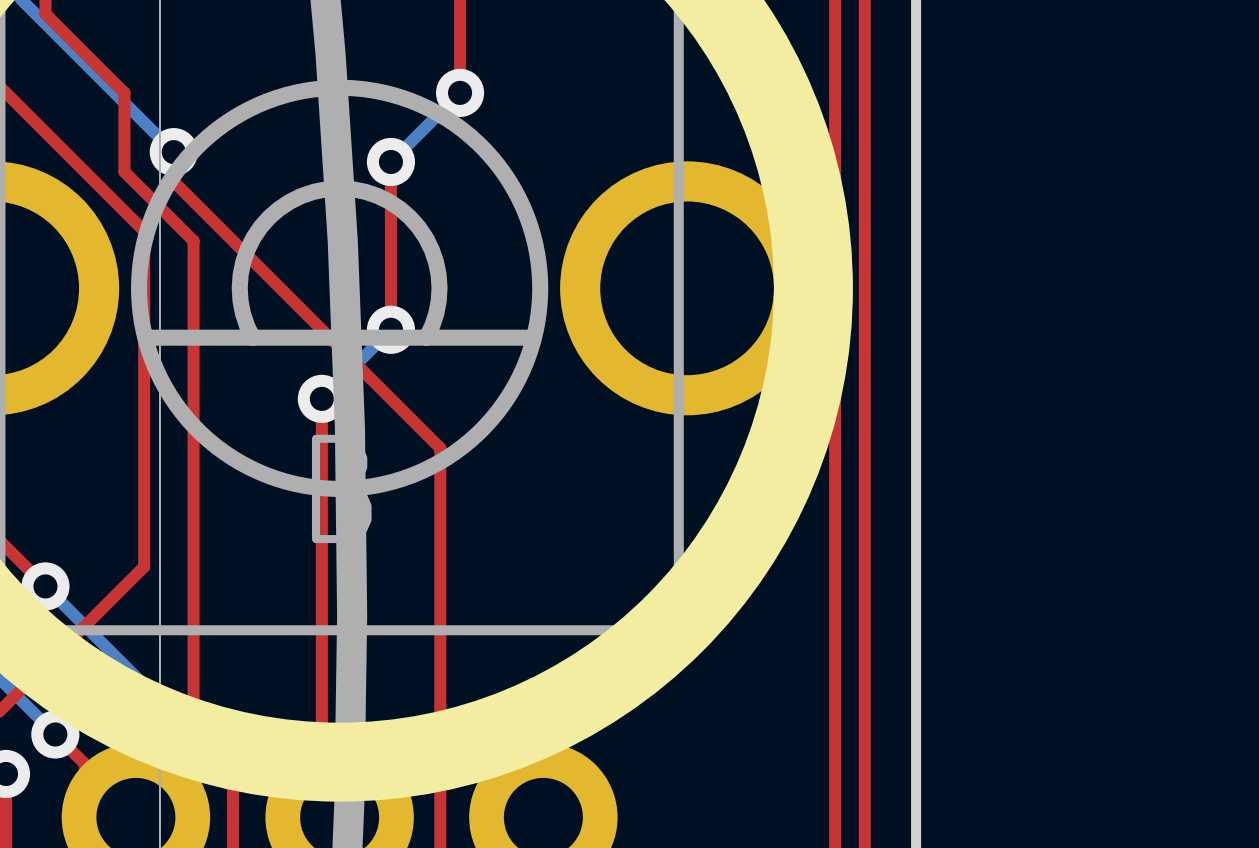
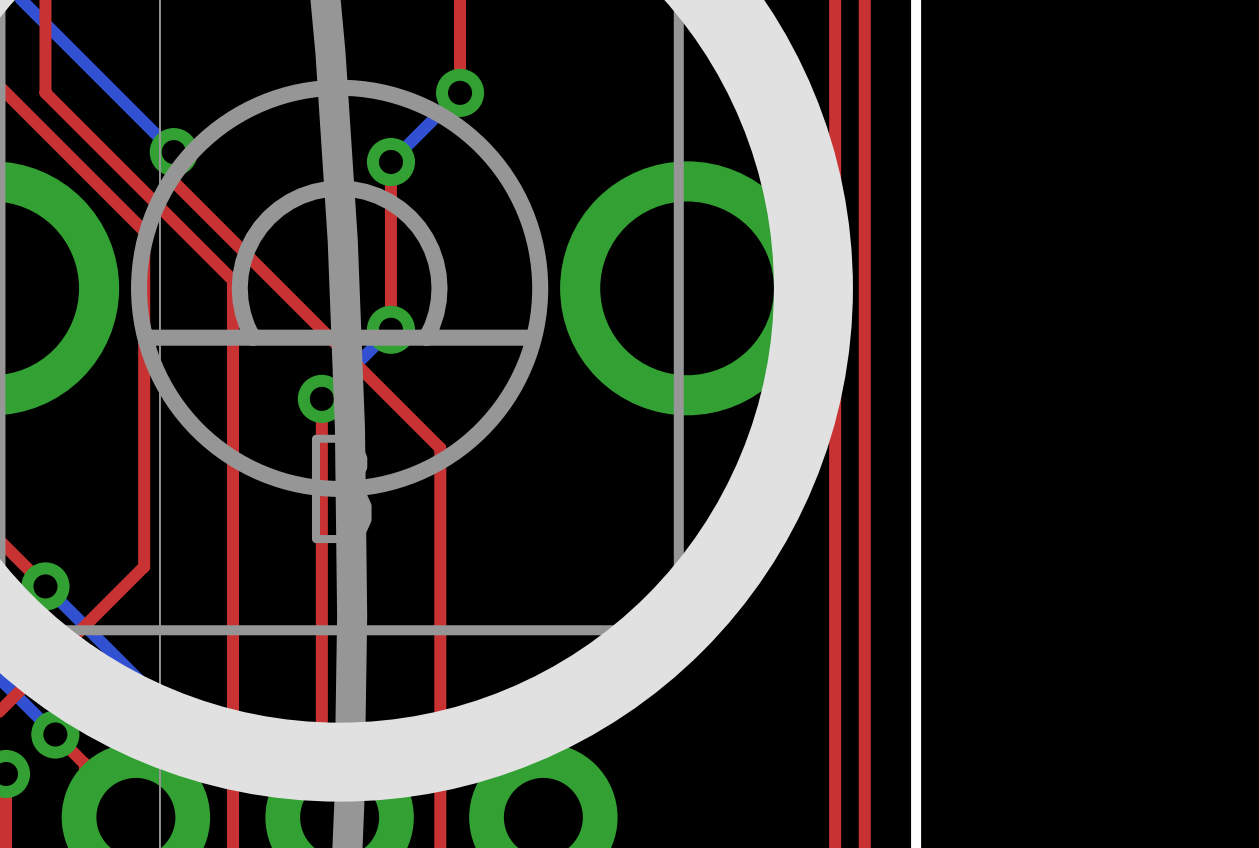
top track: (45, 13) (124, 92) (124, 171) -> (45, 13) (45, 92) (124, 171)
top track: (193, 240) (193, 744) (233, 783) -> (193, 240) (233, 280) (233, 783)

